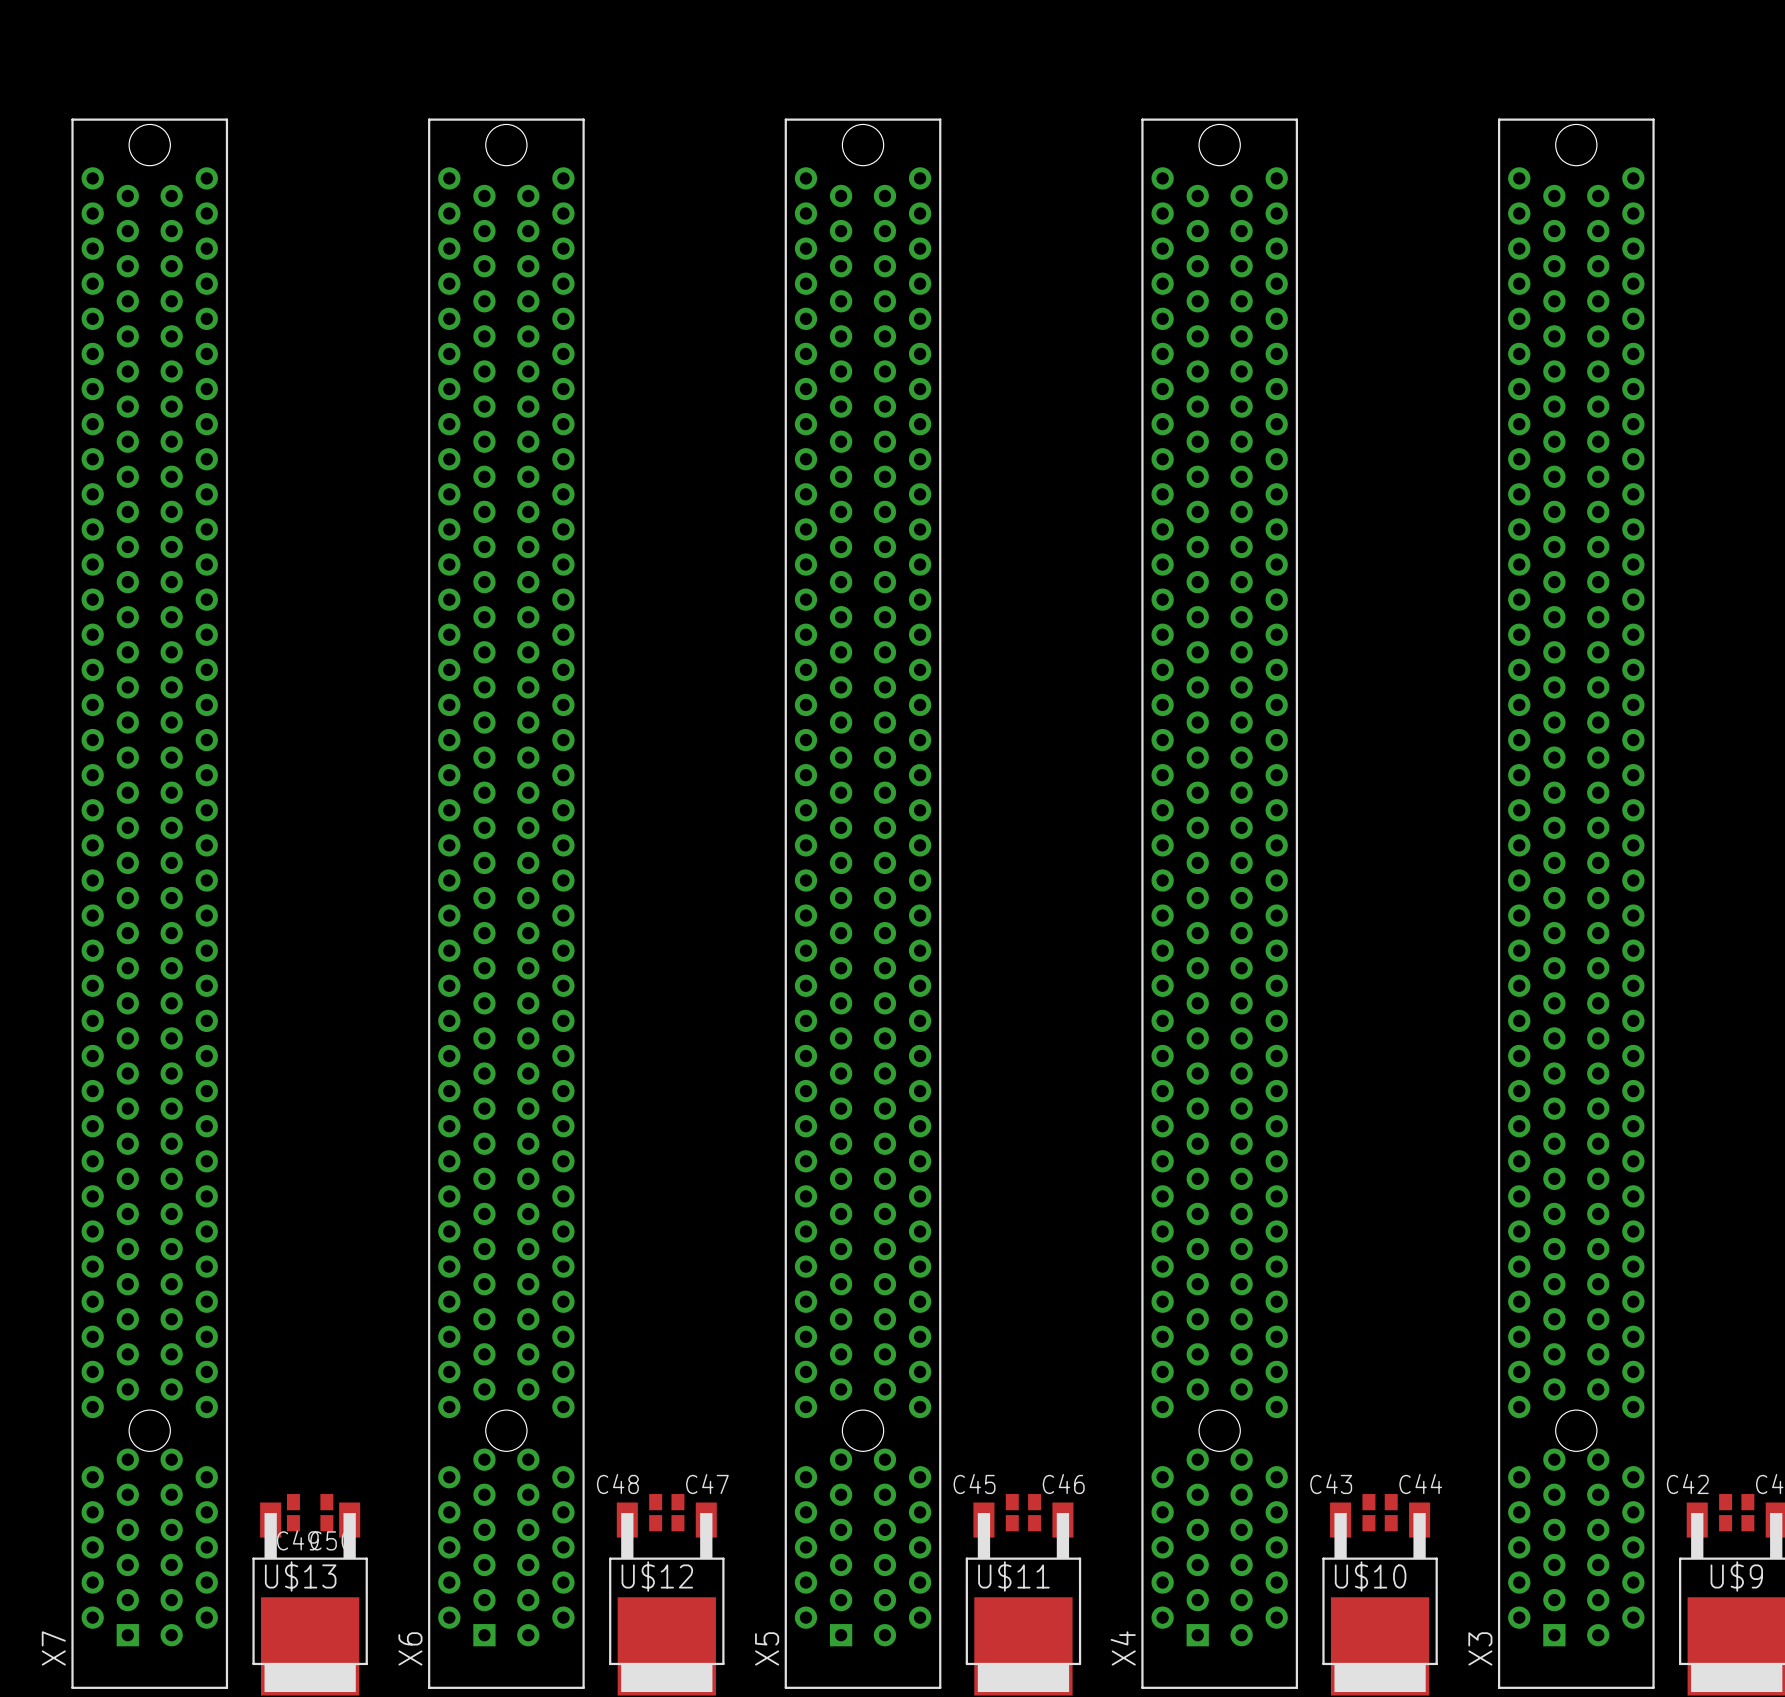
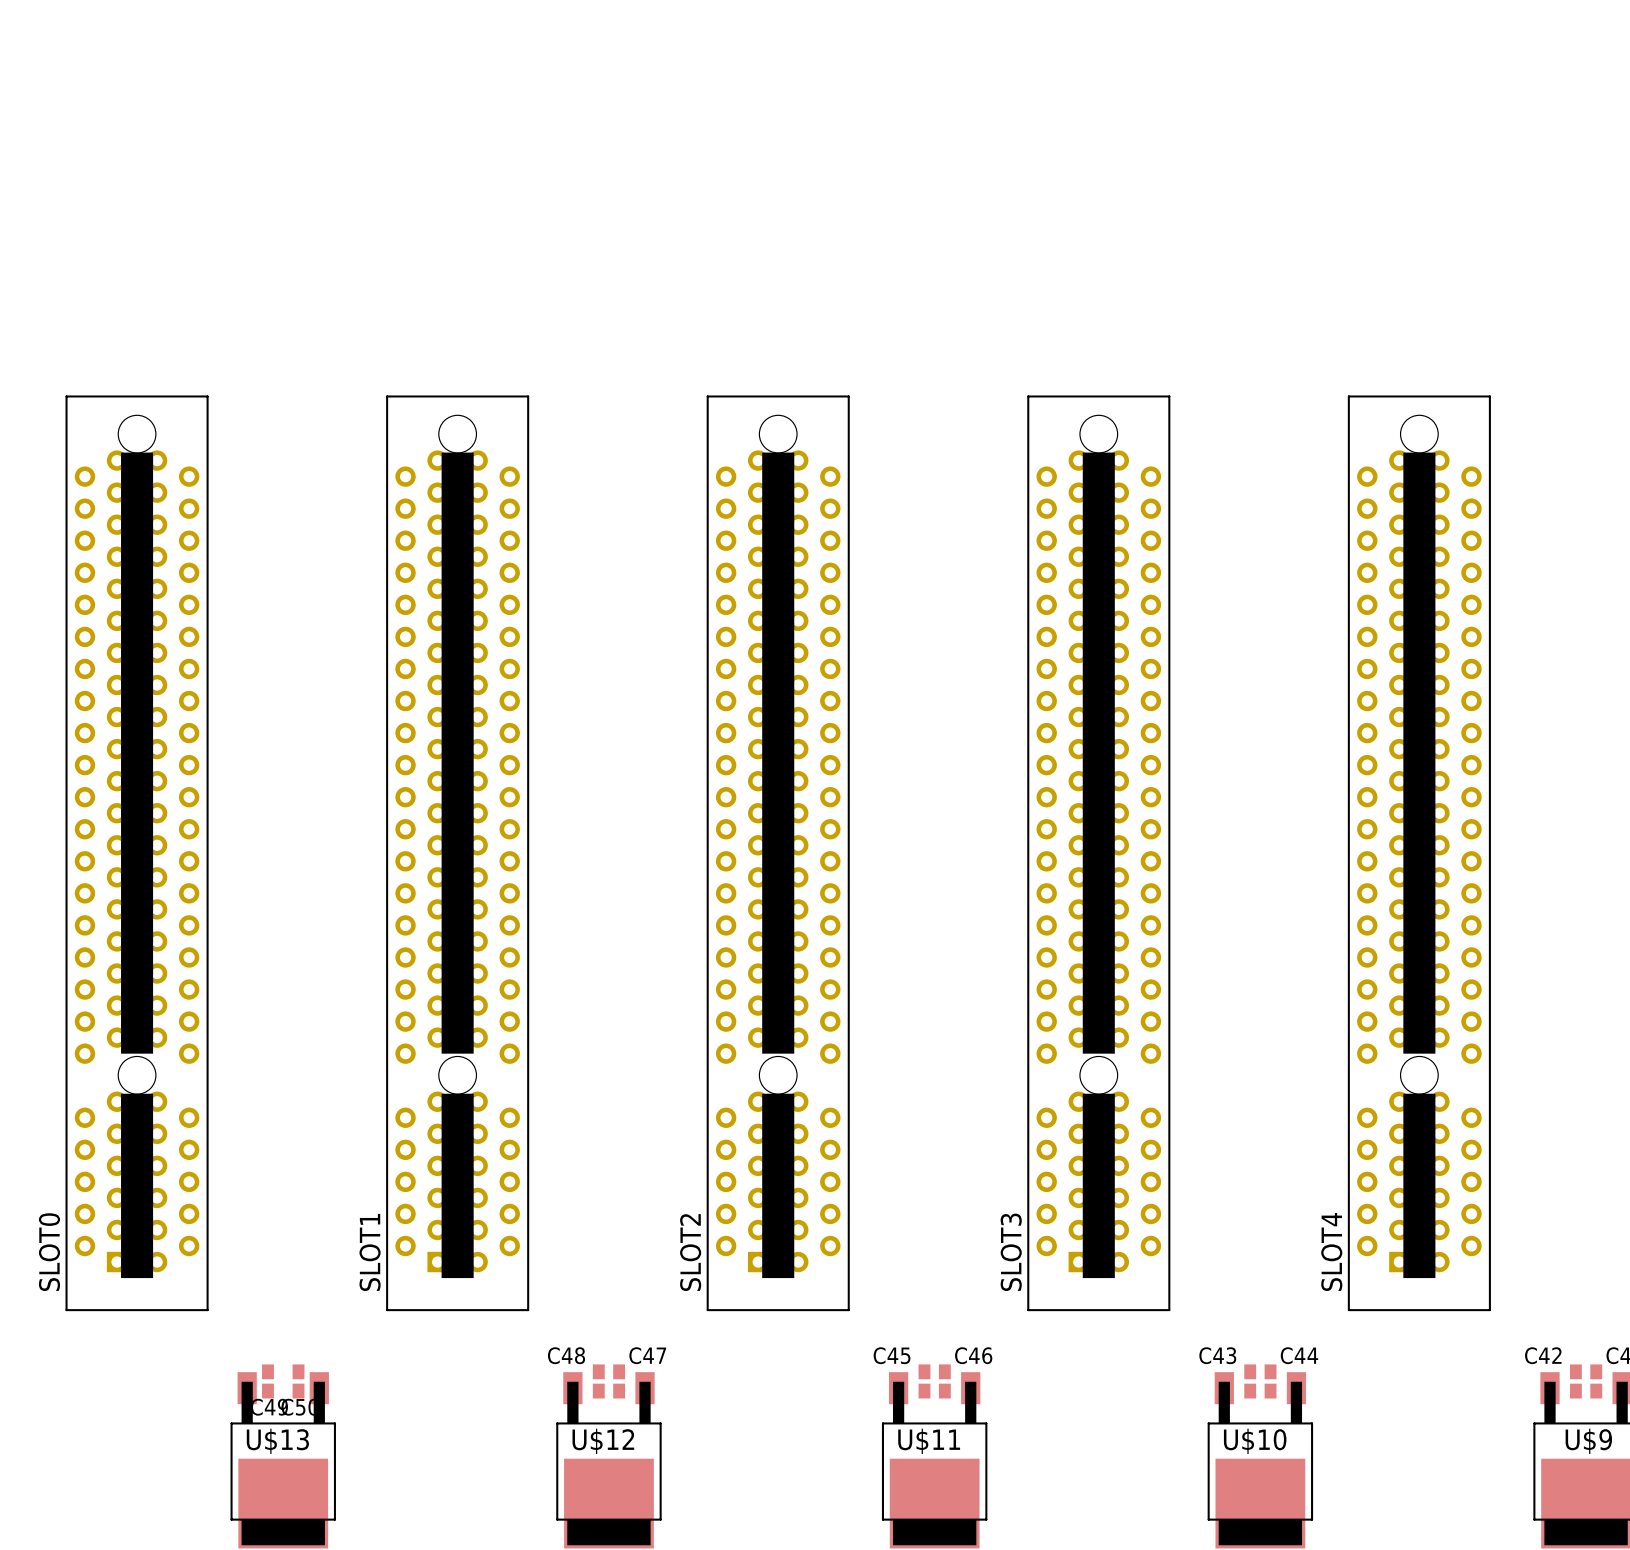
X7: (149, 903) -> none
X6: (506, 903) -> none
X5: (863, 903) -> none
X4: (1219, 903) -> none
X3: (1576, 903) -> none
SLOT0: none -> (137, 853)
SLOT1: none -> (457, 853)
SLOT2: none -> (778, 853)
SLOT3: none -> (1098, 853)
SLOT4: none -> (1419, 853)

